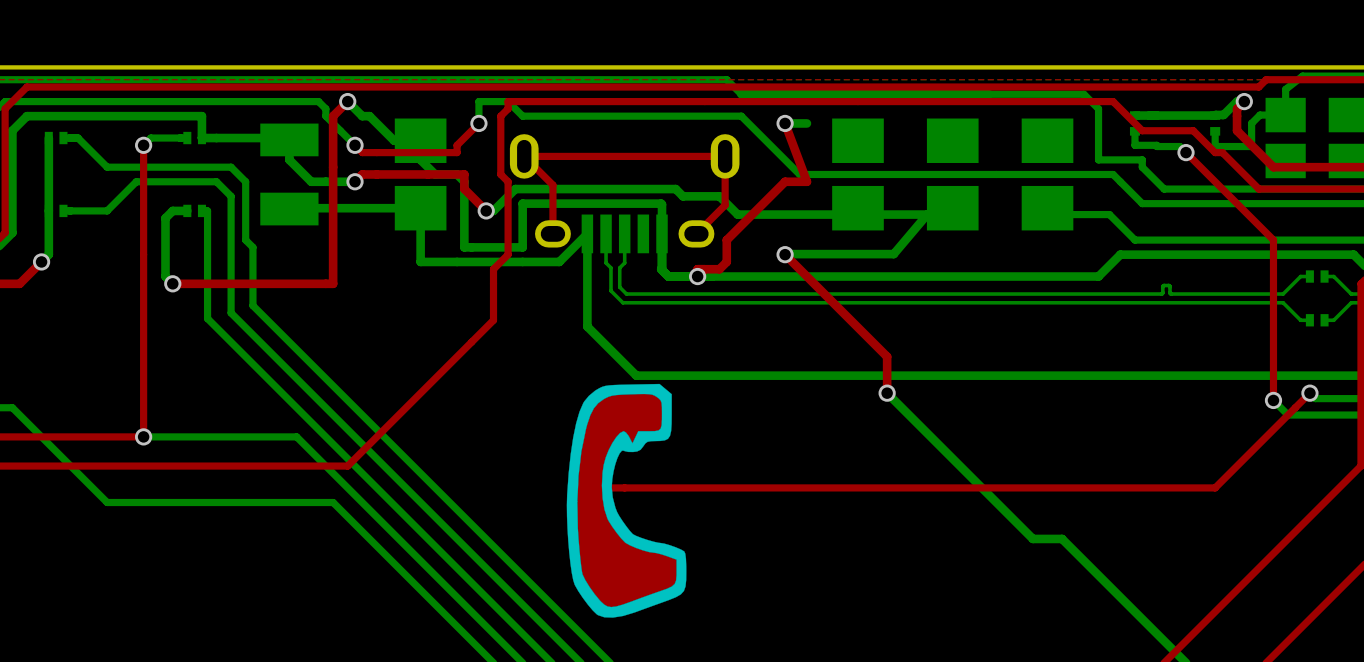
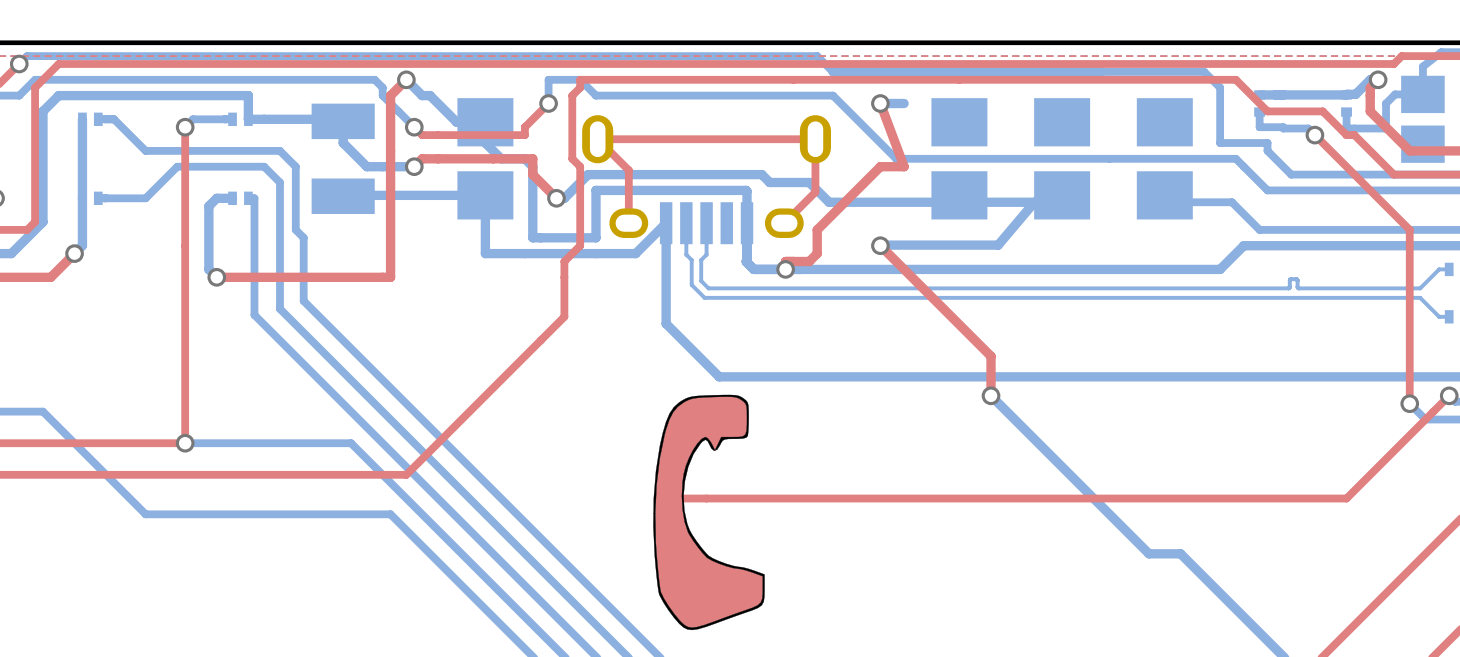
drawing shape: [566, 383, 687, 618] -> [653, 394, 765, 631]

